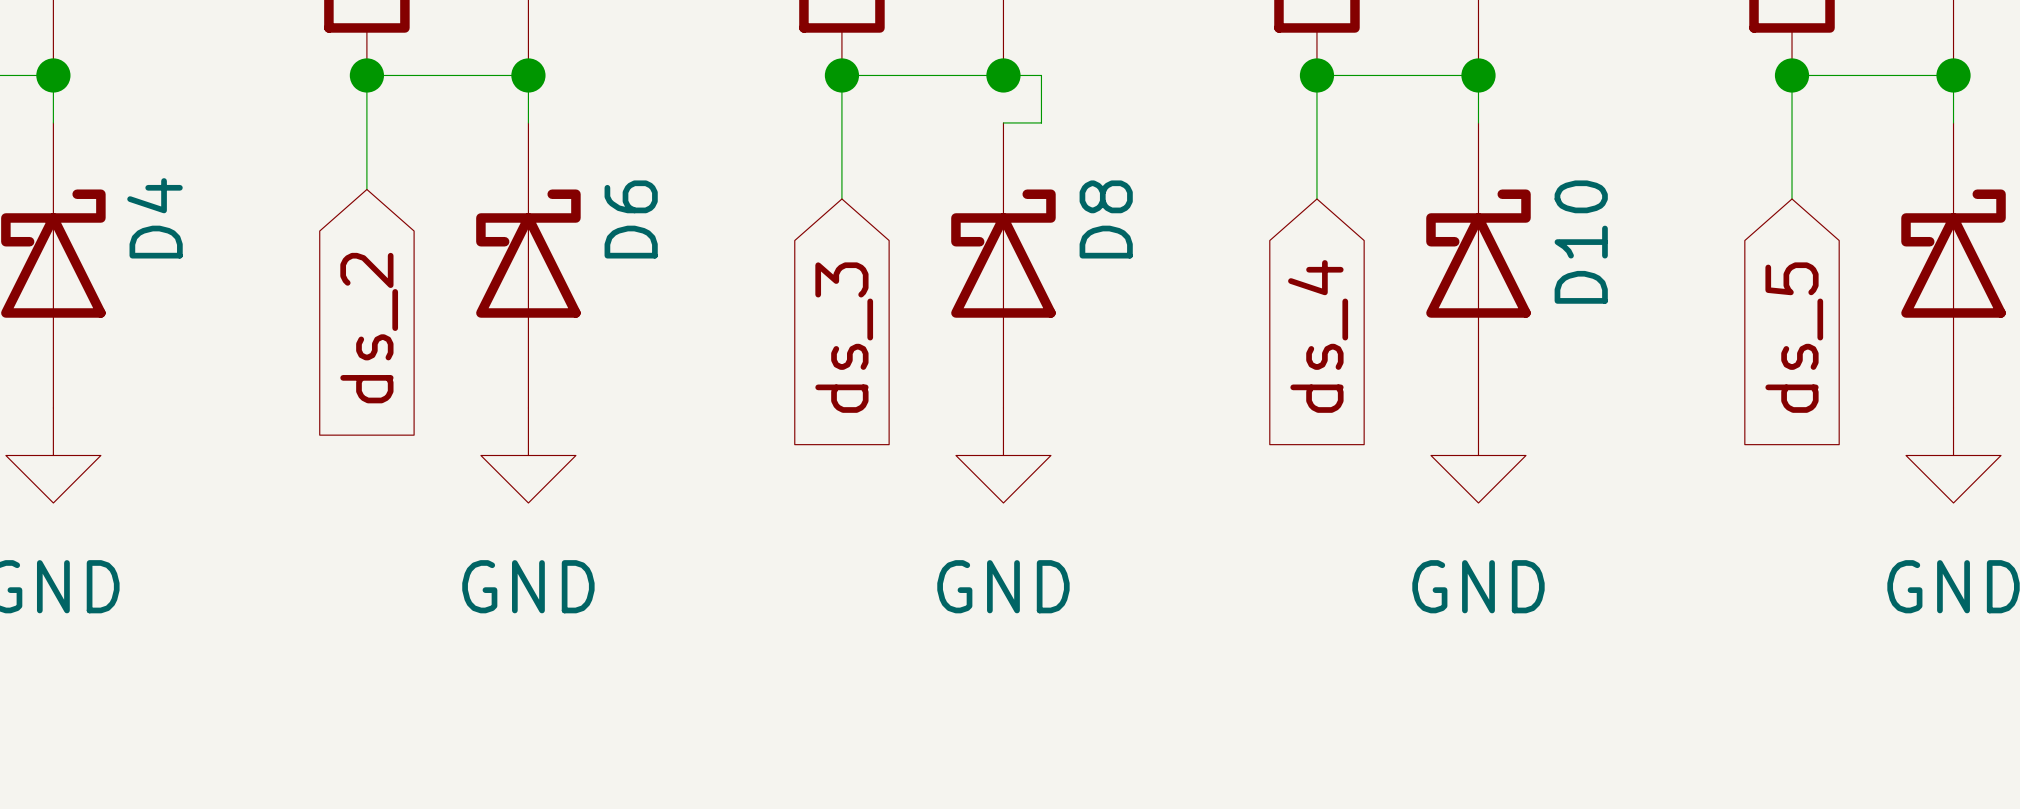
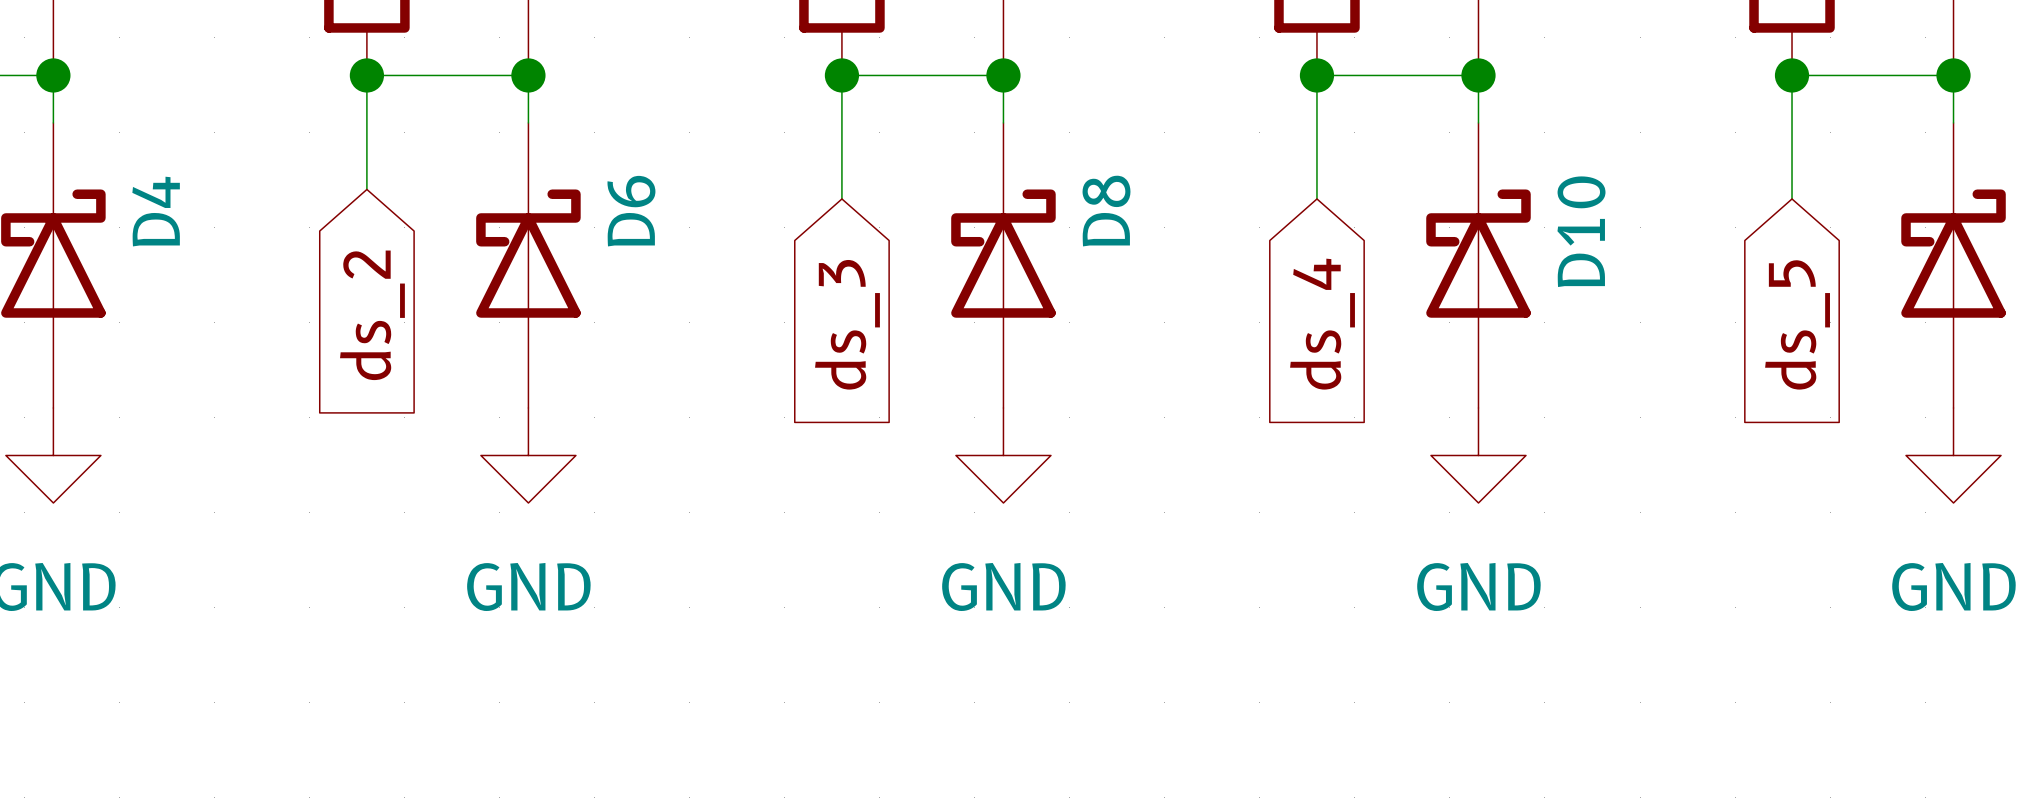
wire: (1003, 75) (1041, 75) (1041, 122) (1003, 122) -> (1003, 75) (1003, 122)

